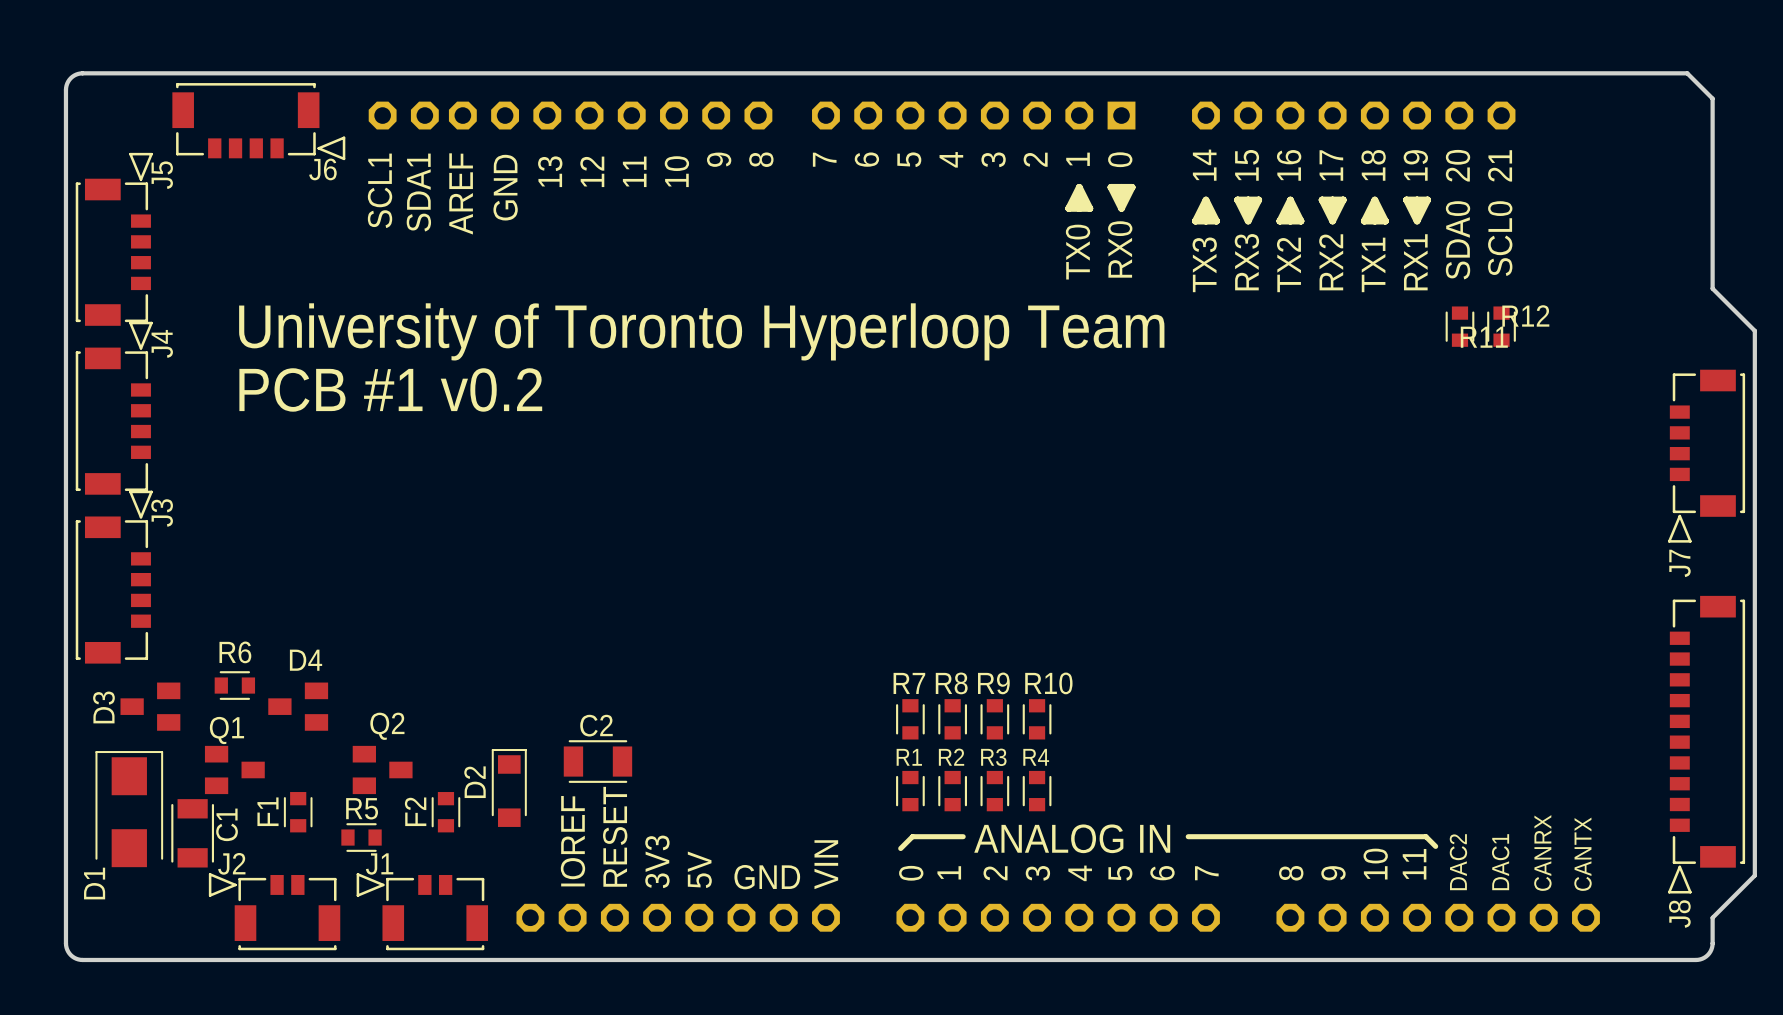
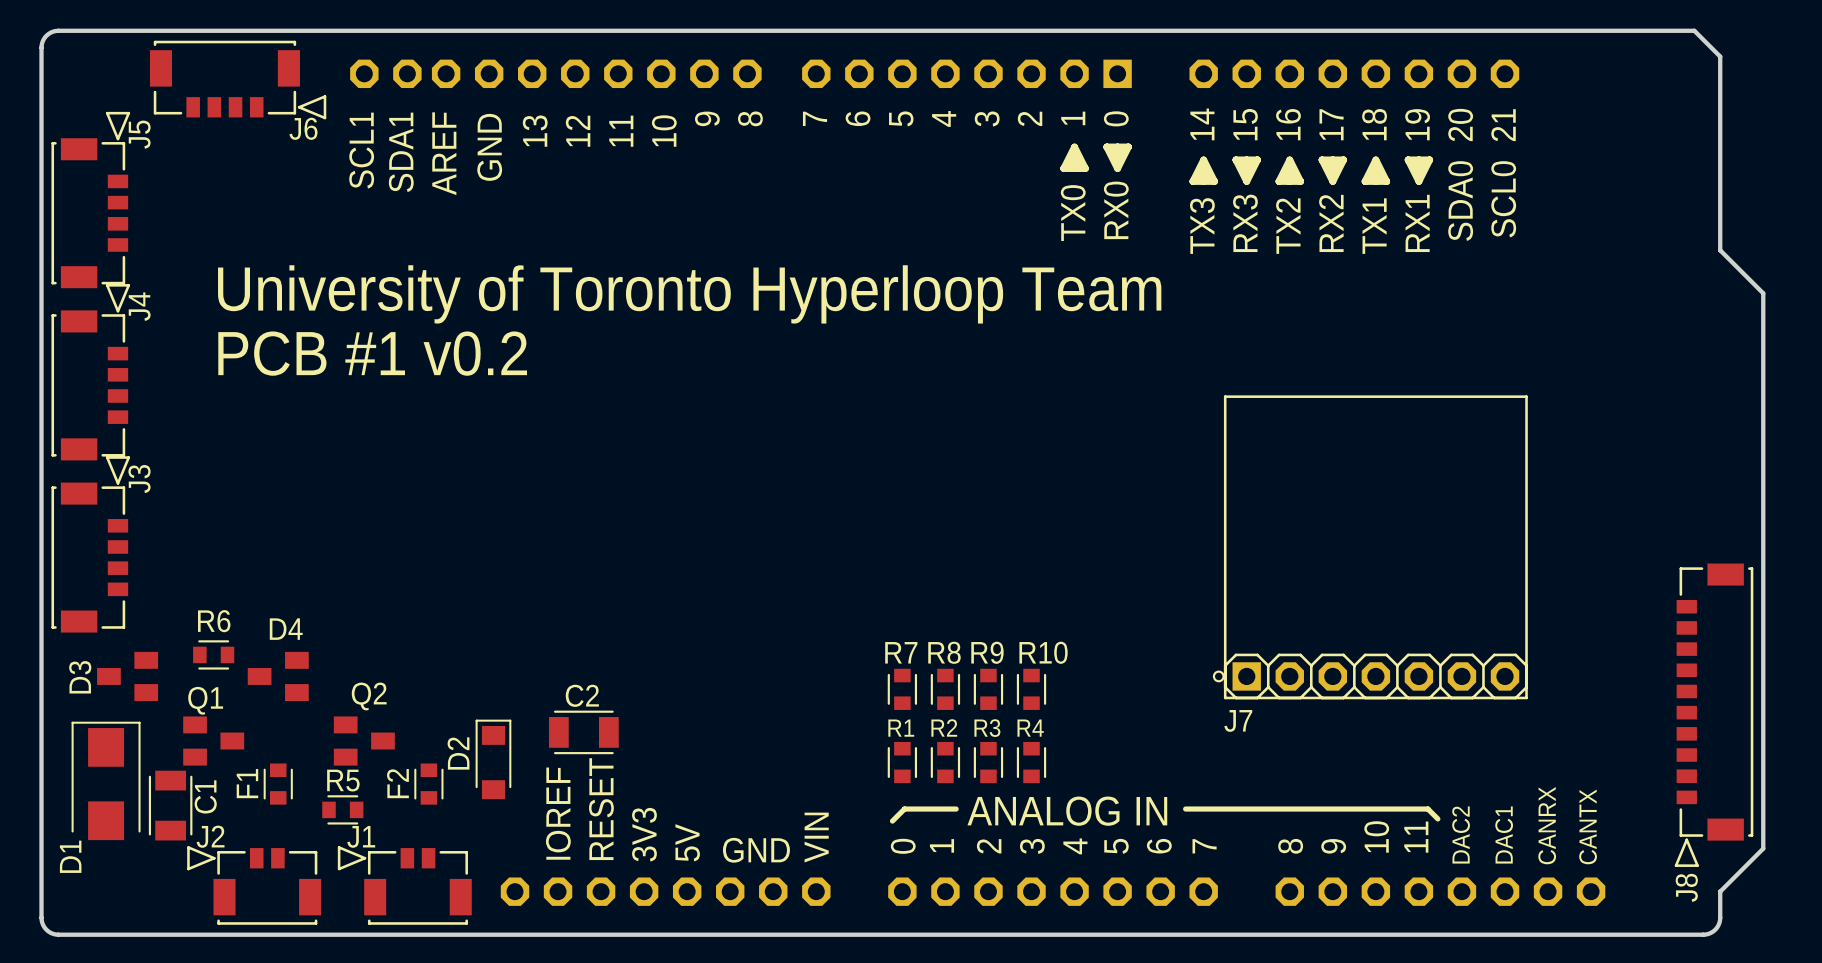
R11: (1459, 326) -> none
R12: (1501, 326) -> none
J7 footprint: [1668, 369, 1746, 543] -> [1212, 653, 1528, 700]
line: none -> (1225, 396) (1225, 697) (1526, 697) (1526, 396) (1225, 396)
J7 name position: J7 (1679, 563) -> J7 (1238, 720)

